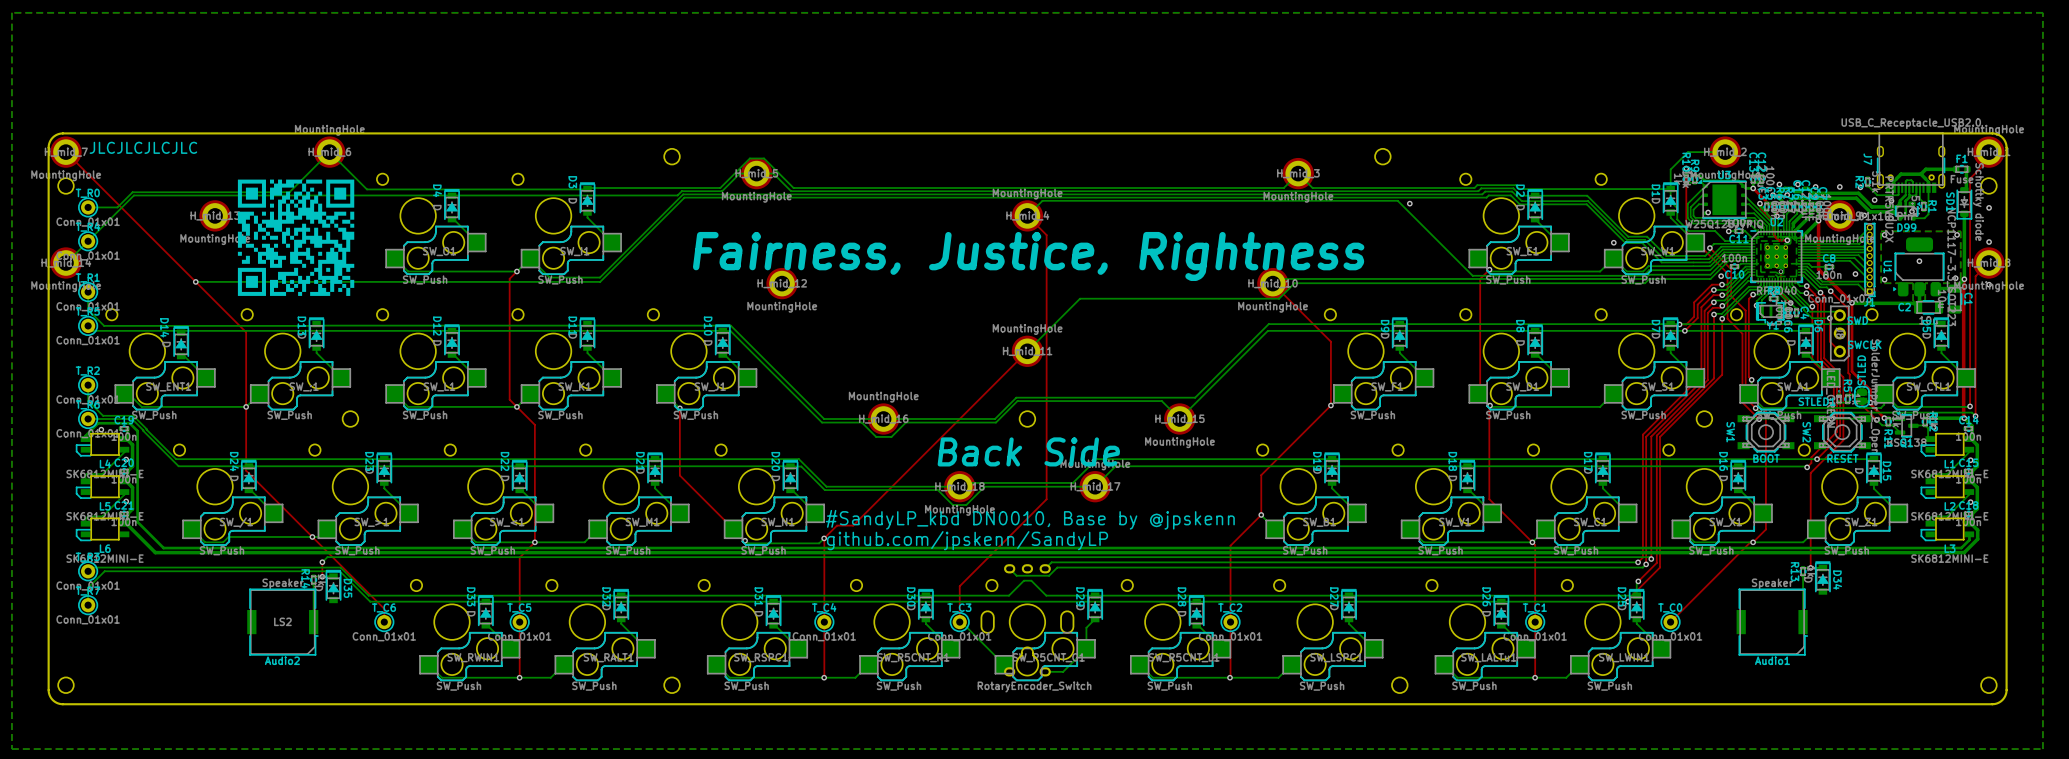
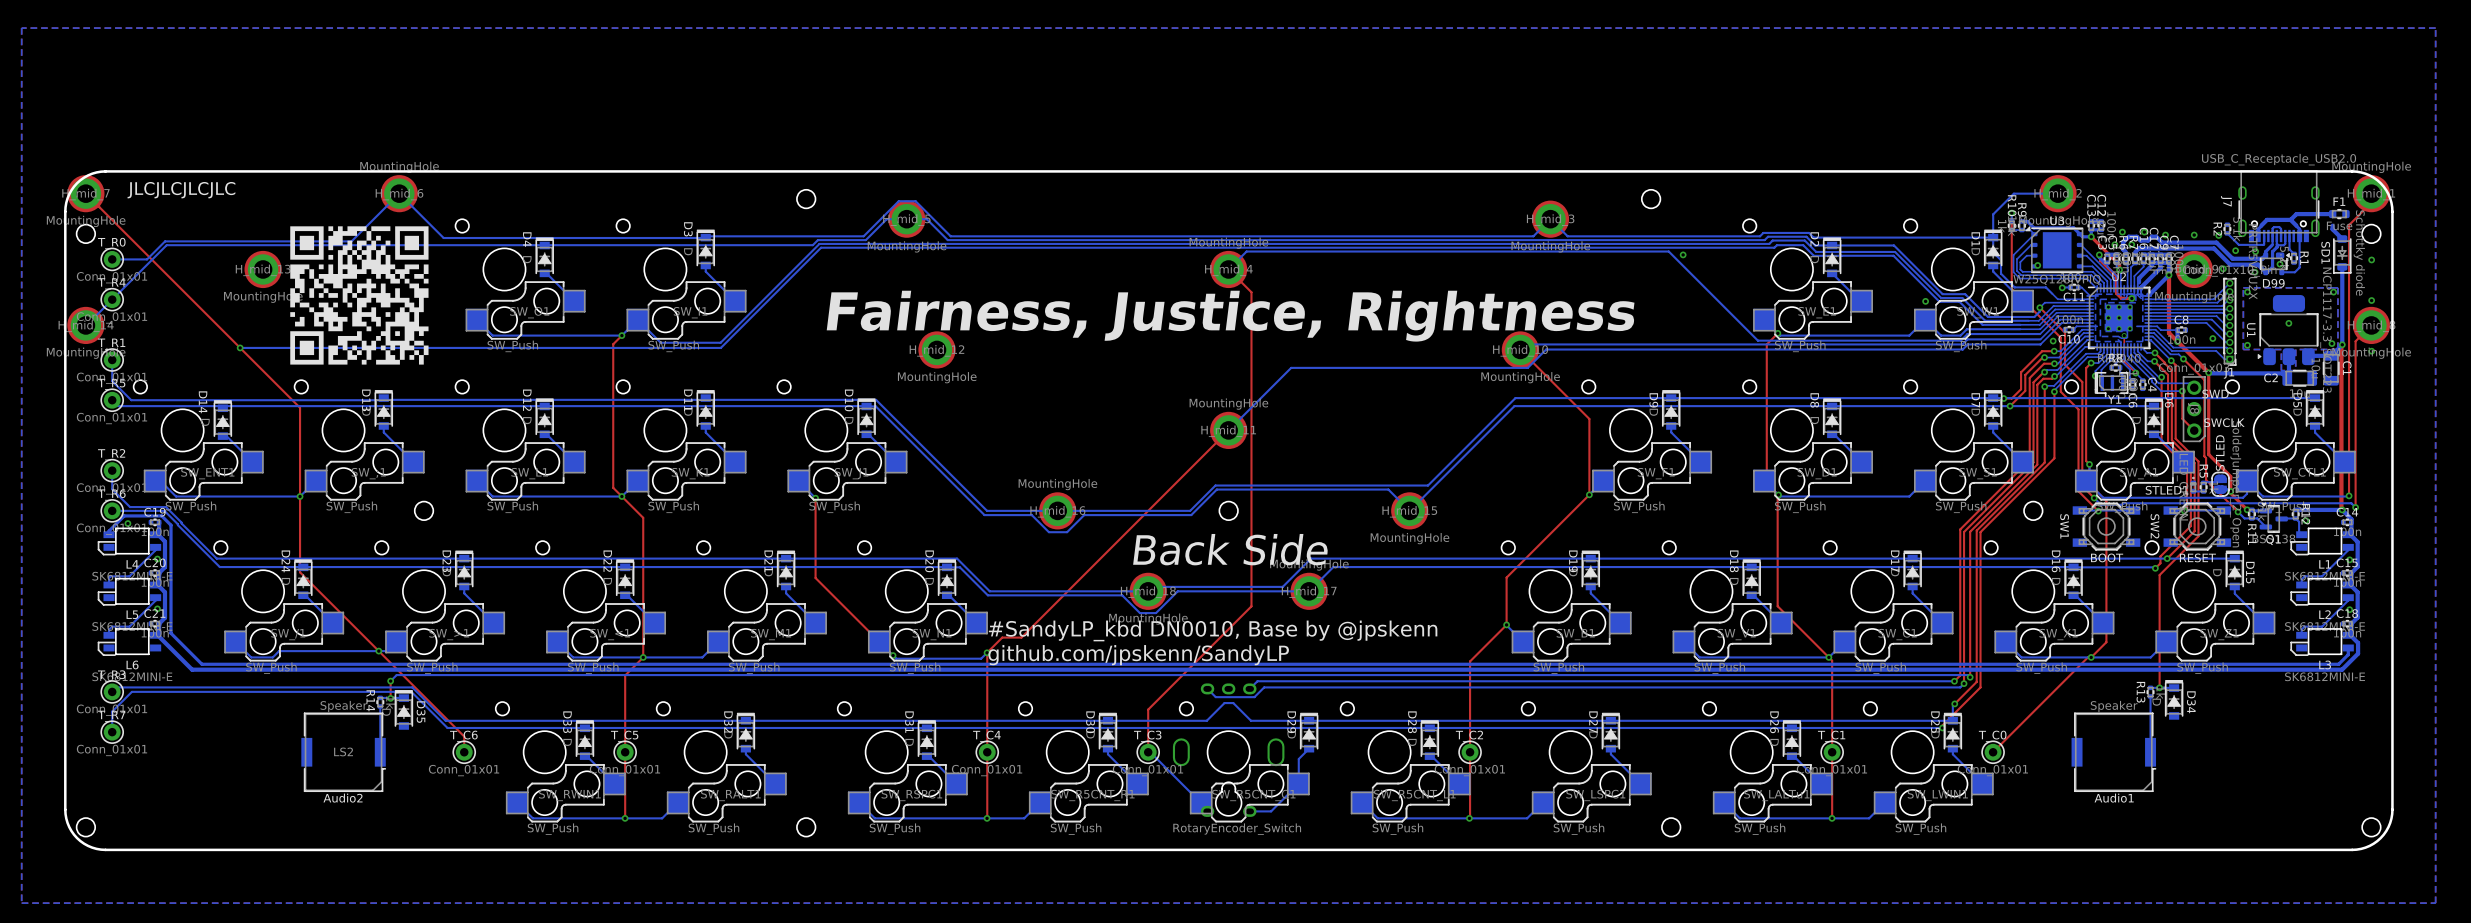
drawing shape: [47, 132, 2008, 706] -> [64, 170, 2394, 852]
text position: JLCJLCJLCJLC (143, 147) -> JLCJLCJLCJLC (181, 190)
bottom track: (1967, 169) (1966, 188) (1964, 190) -> (2332, 225) (2332, 229) (2342, 239)

